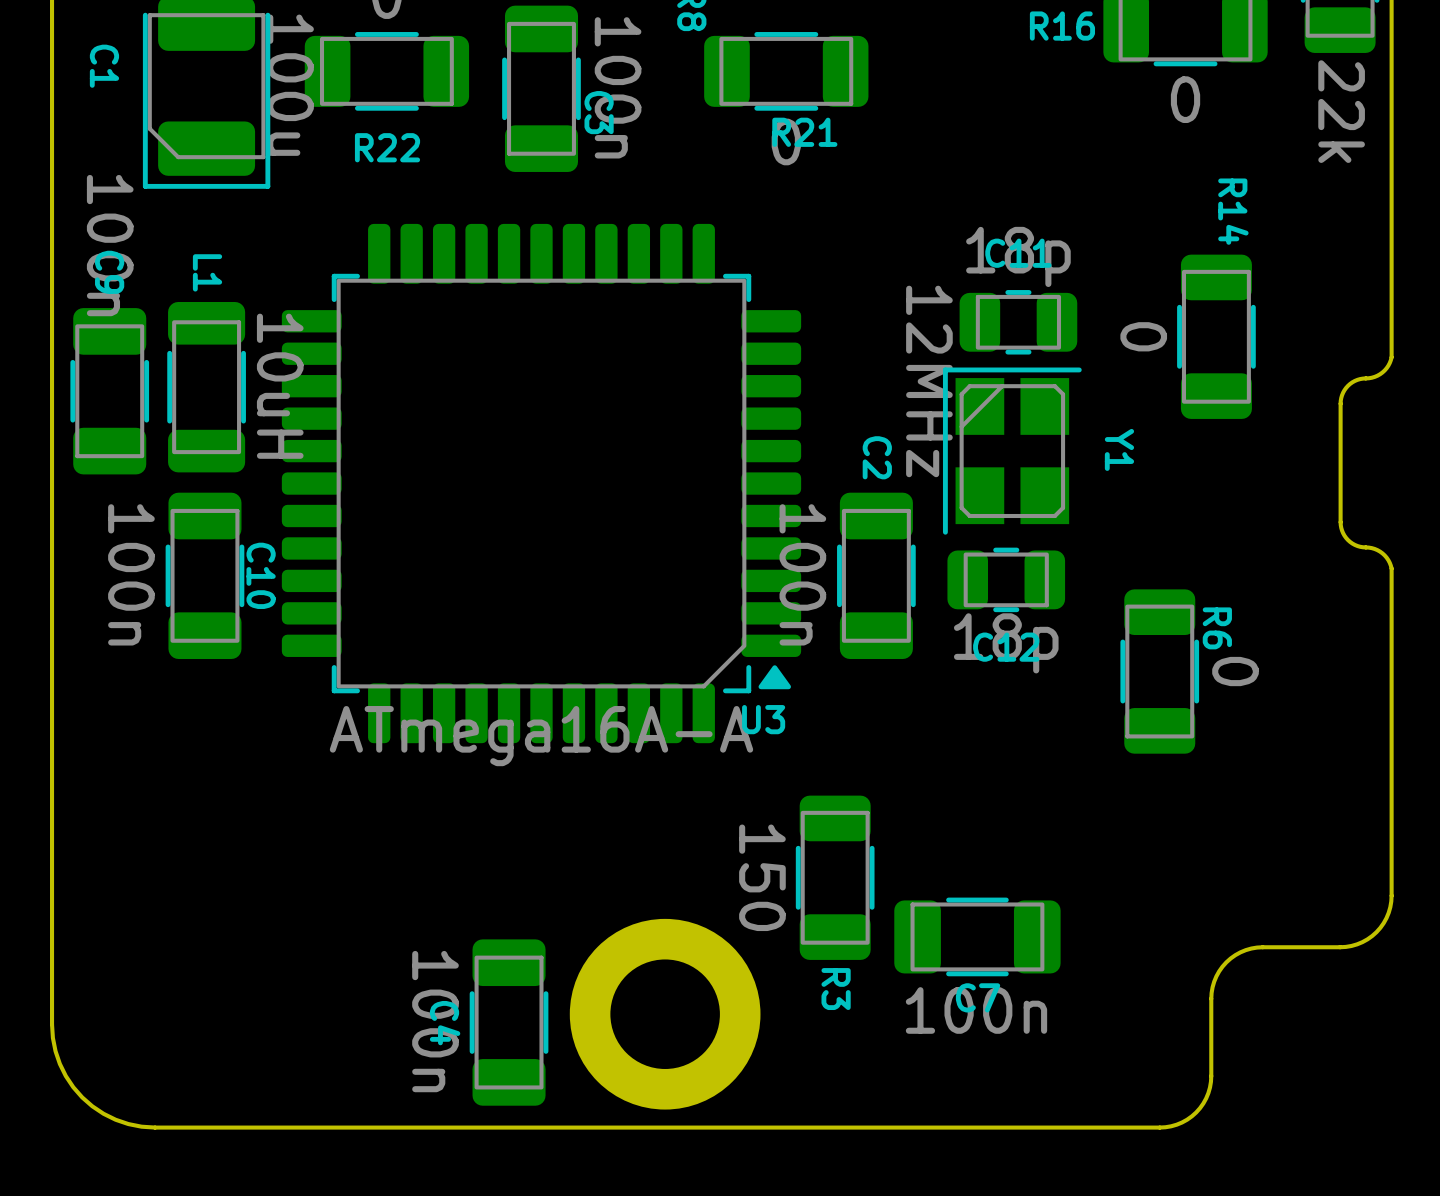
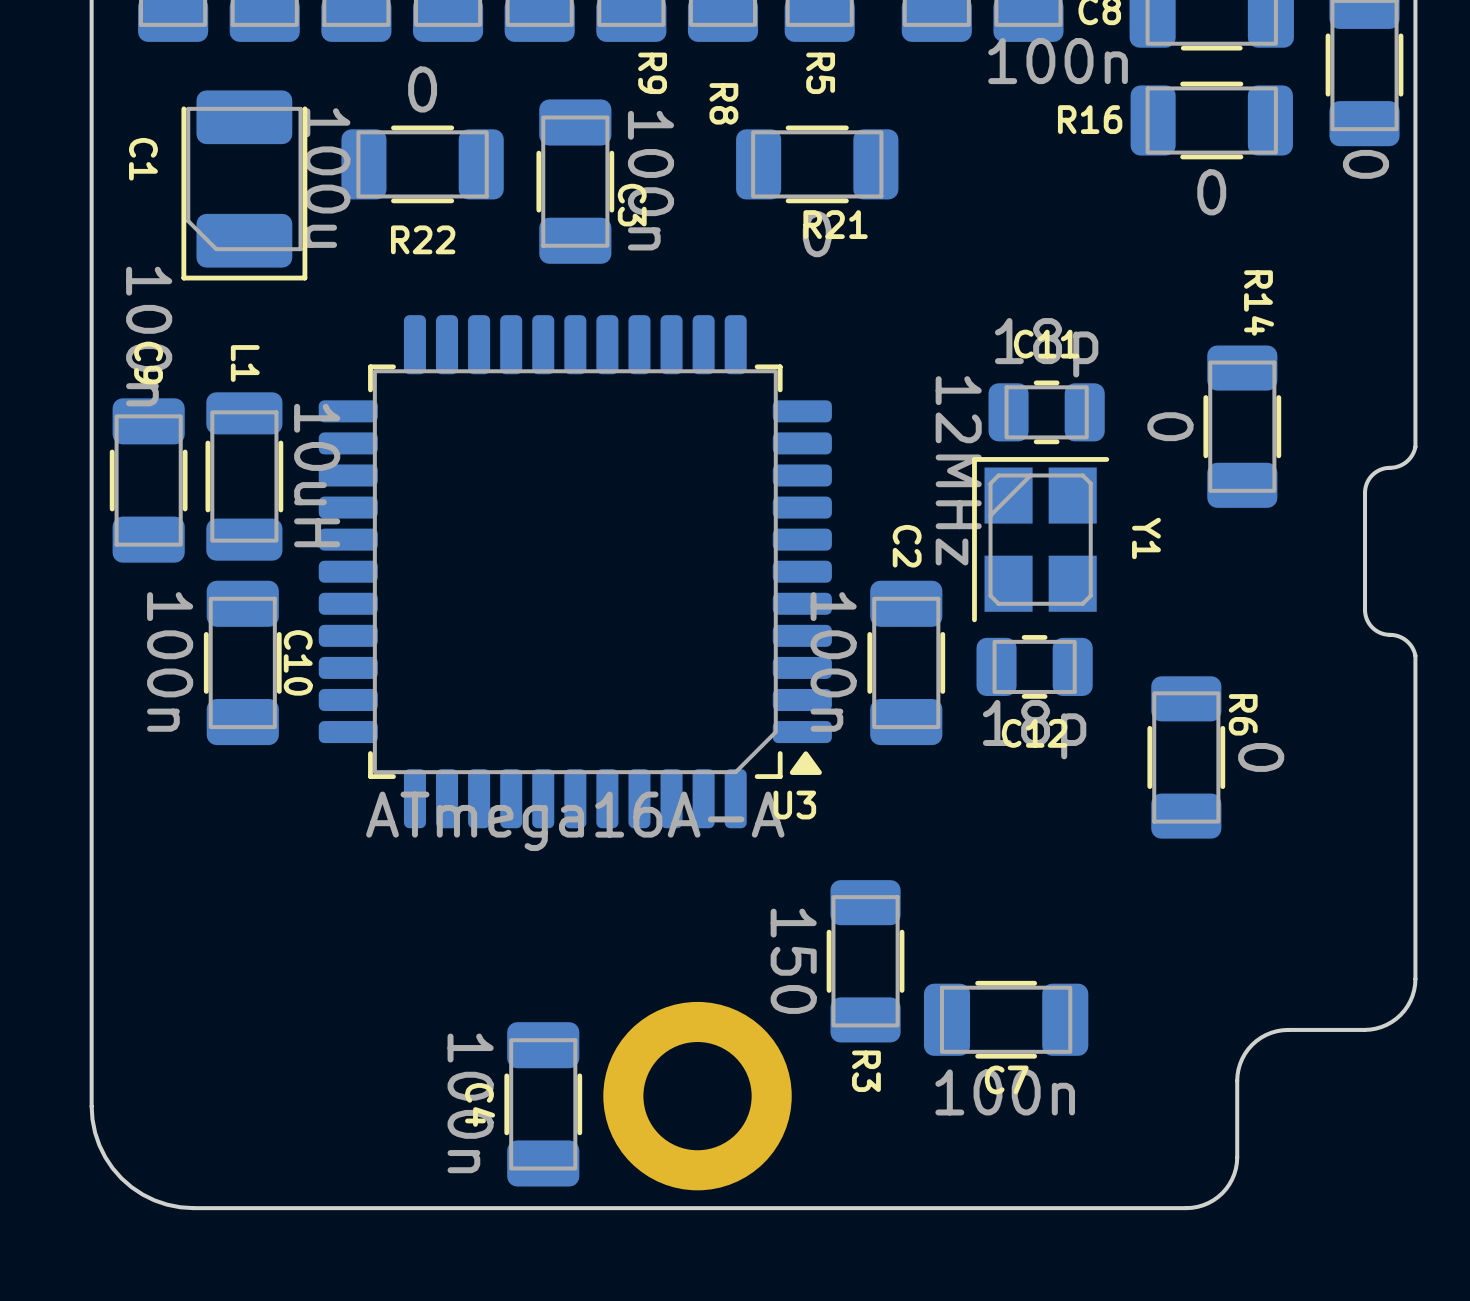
part value: 22k (1341, 111) -> 0 (1366, 164)

